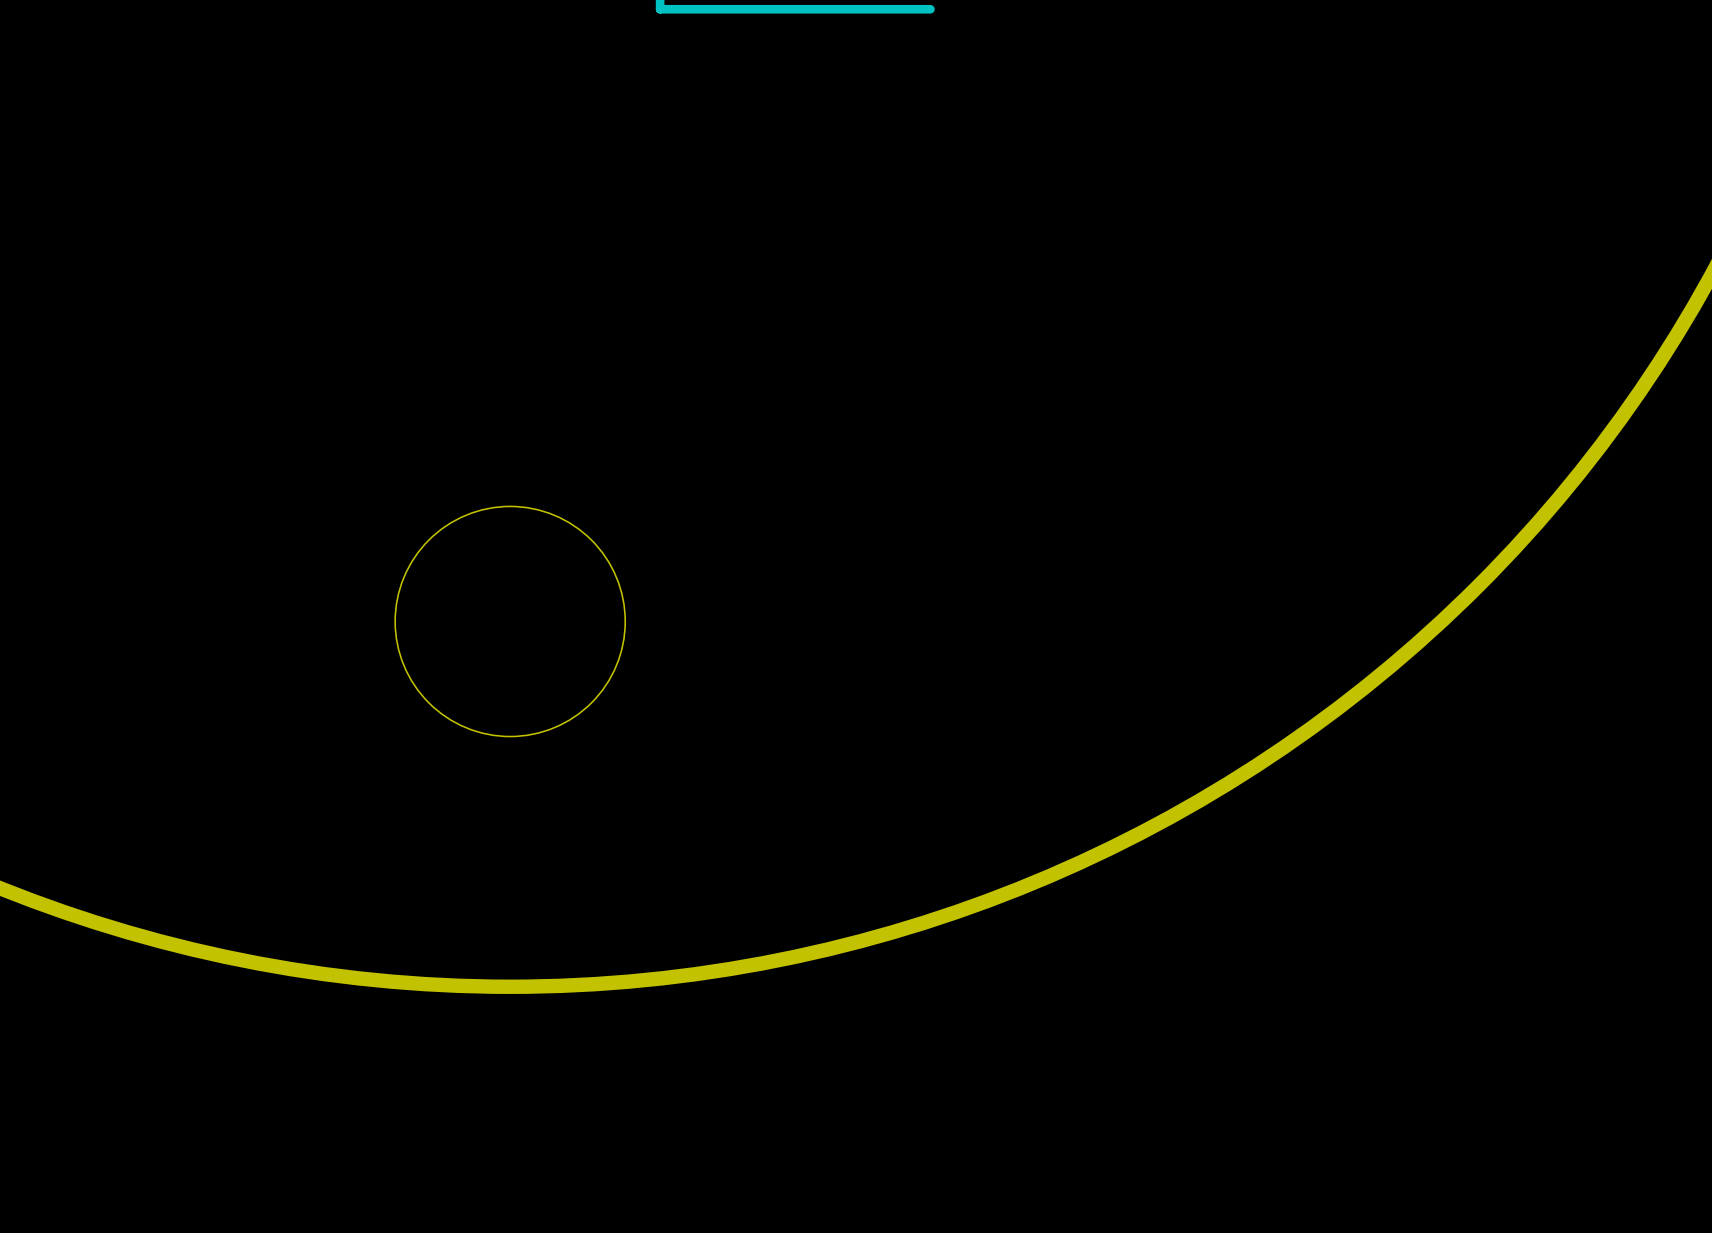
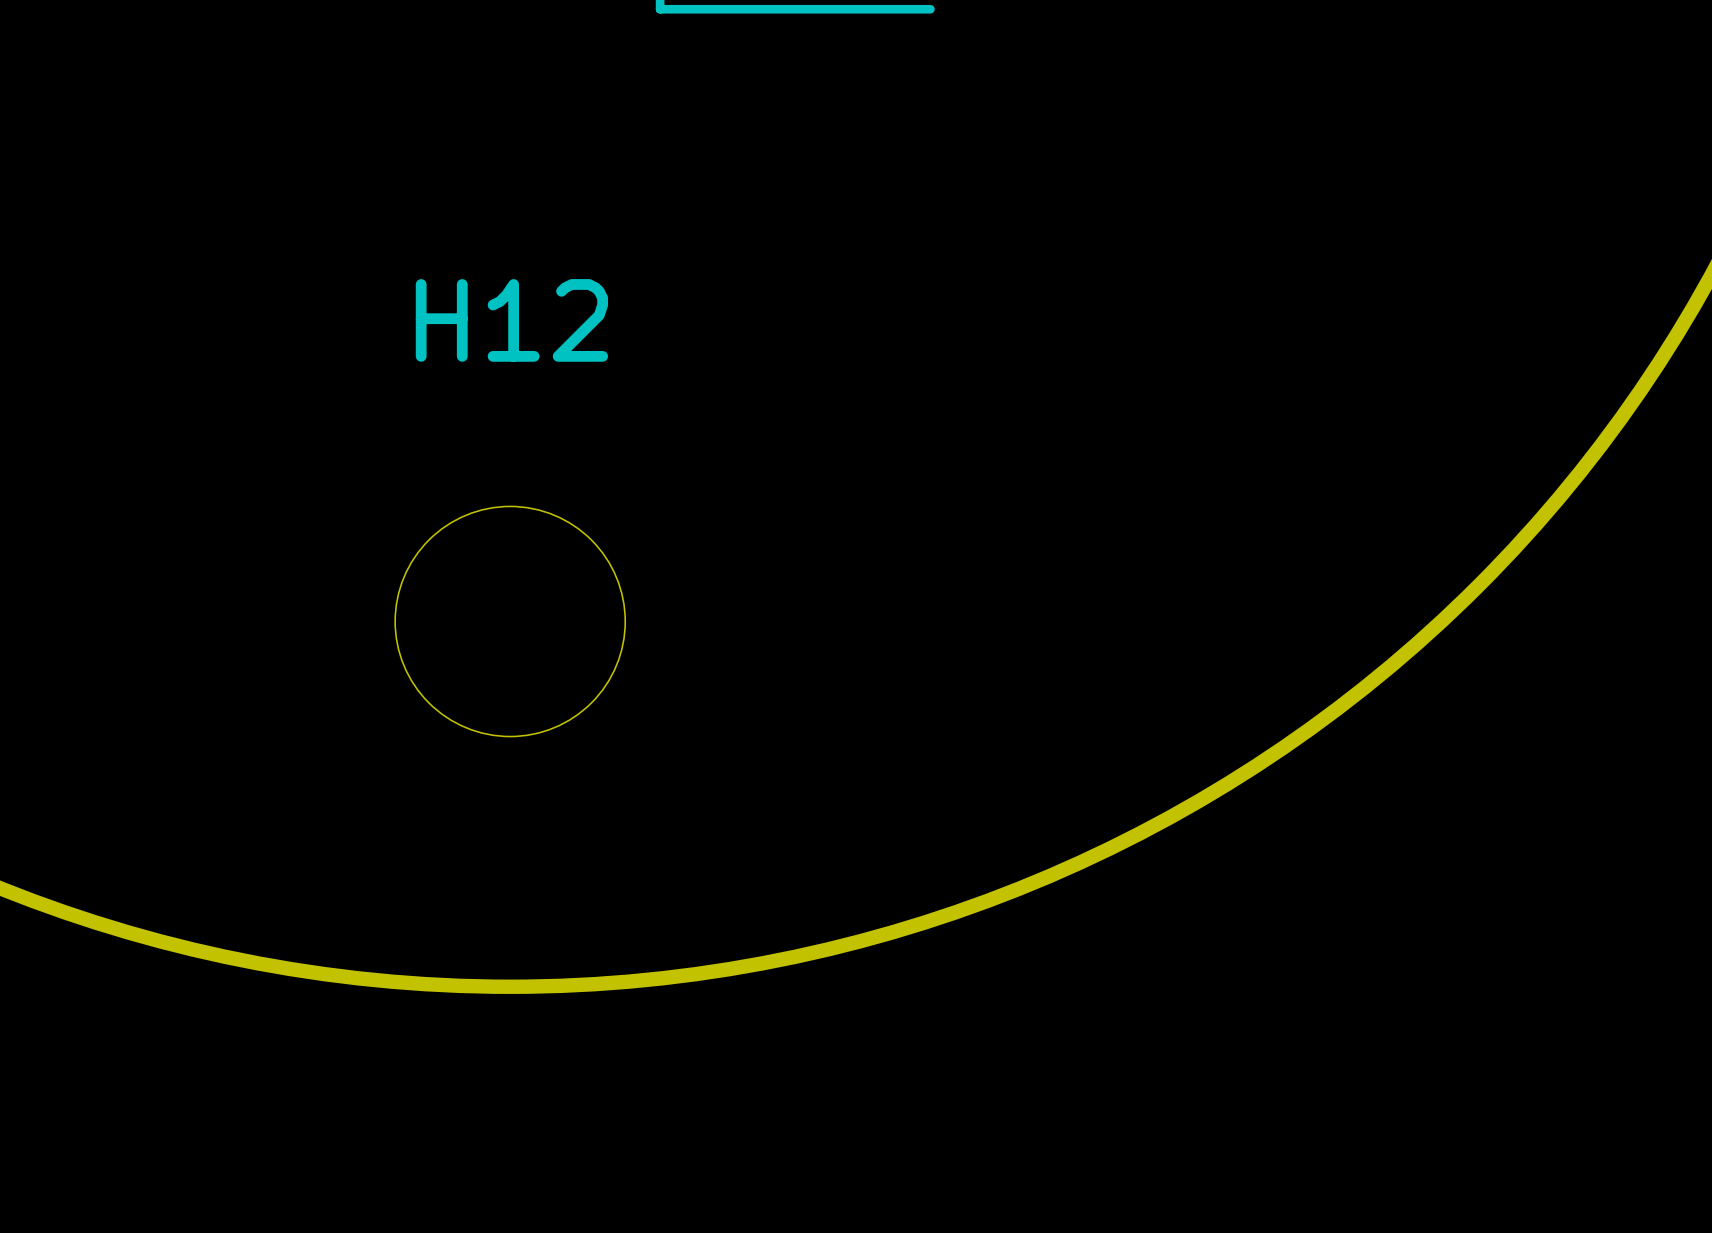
H12 name: none -> H12 (511, 320)

